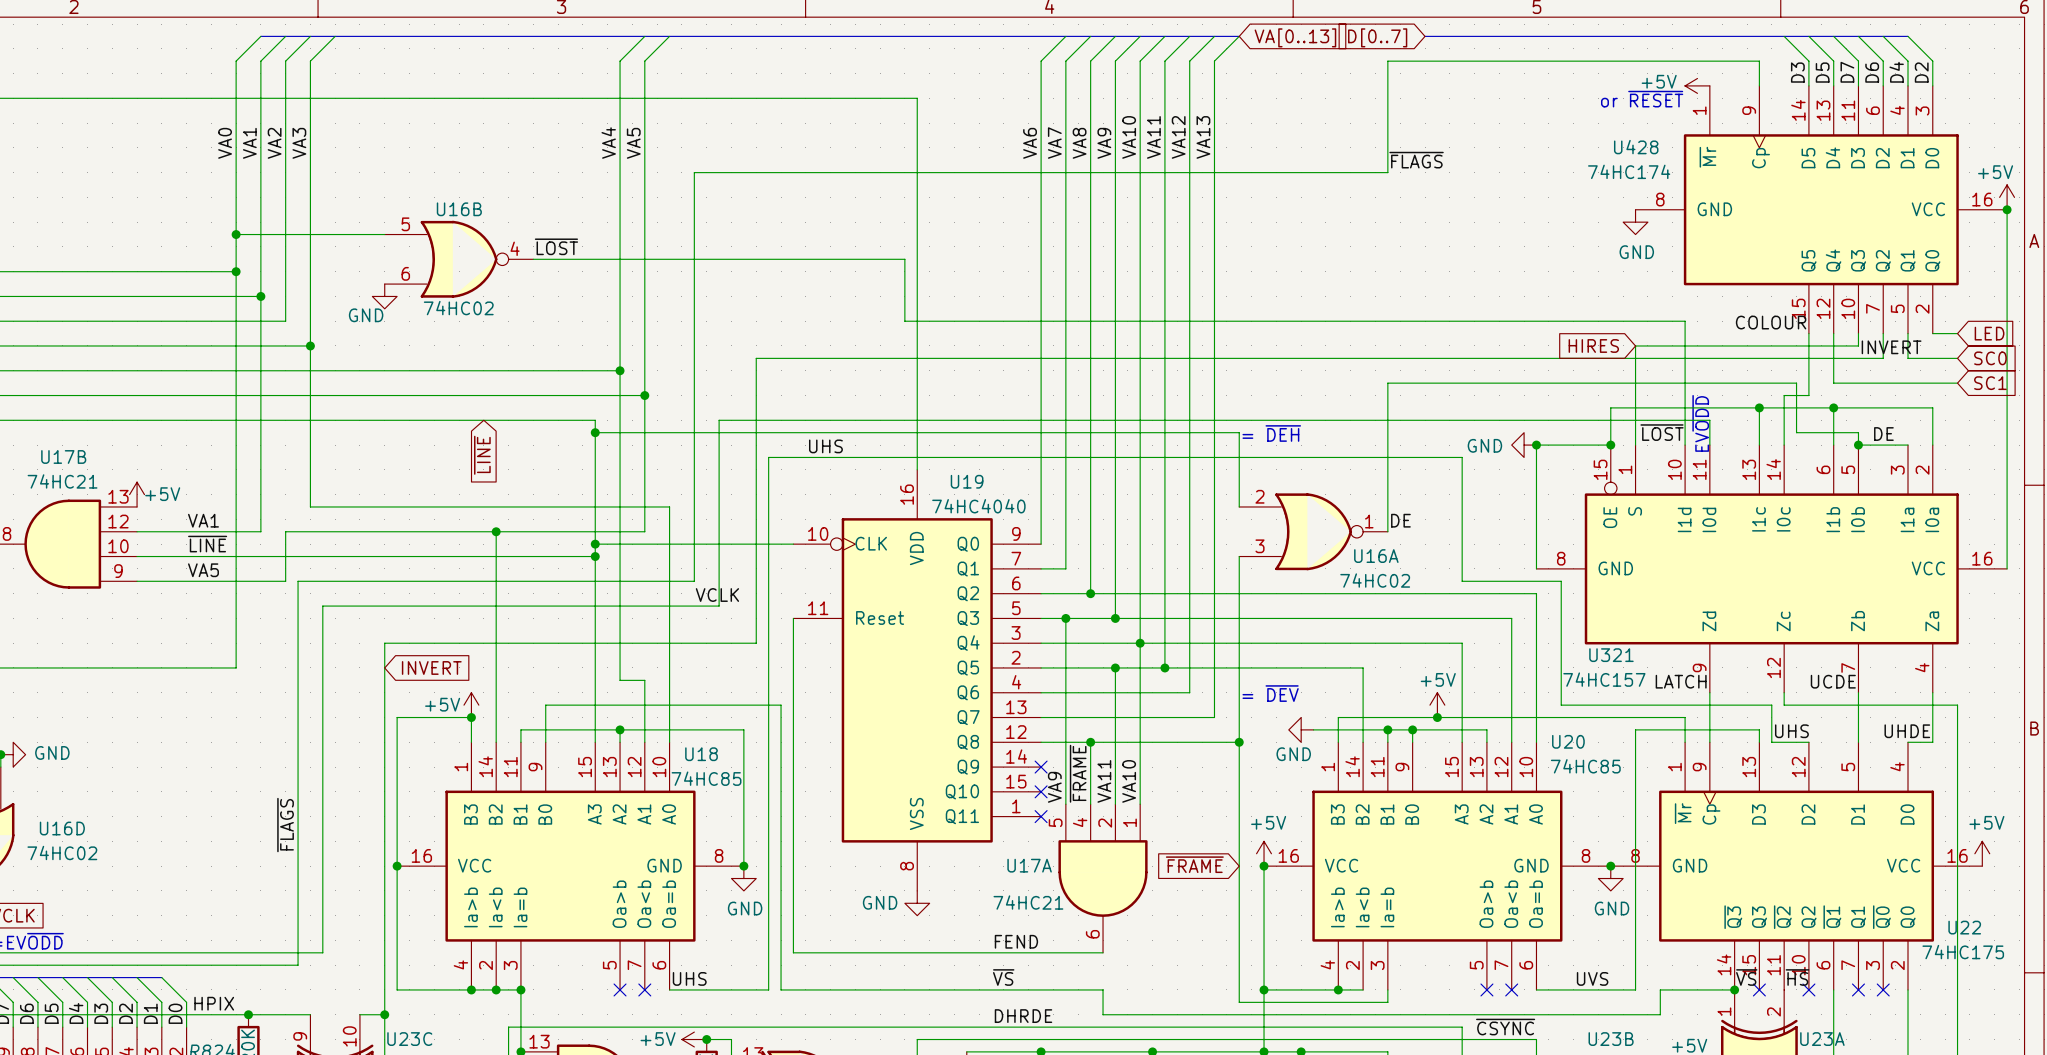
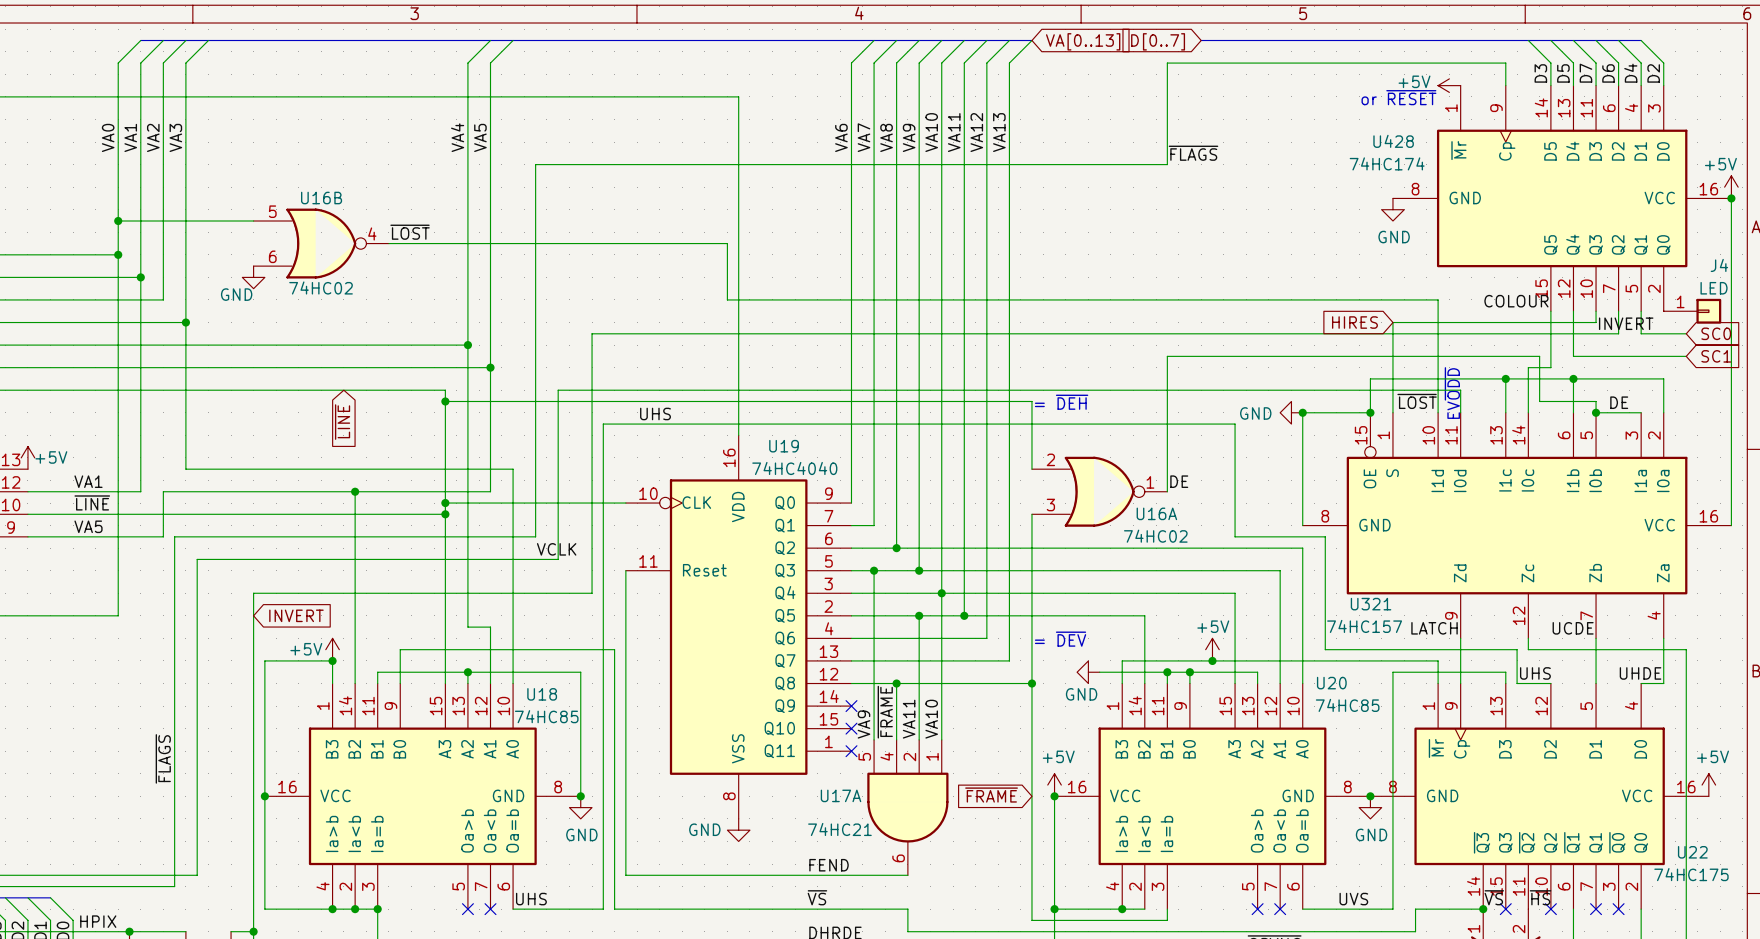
J4: none -> LED (1692, 311)
global label: LED (1989, 333) -> none

